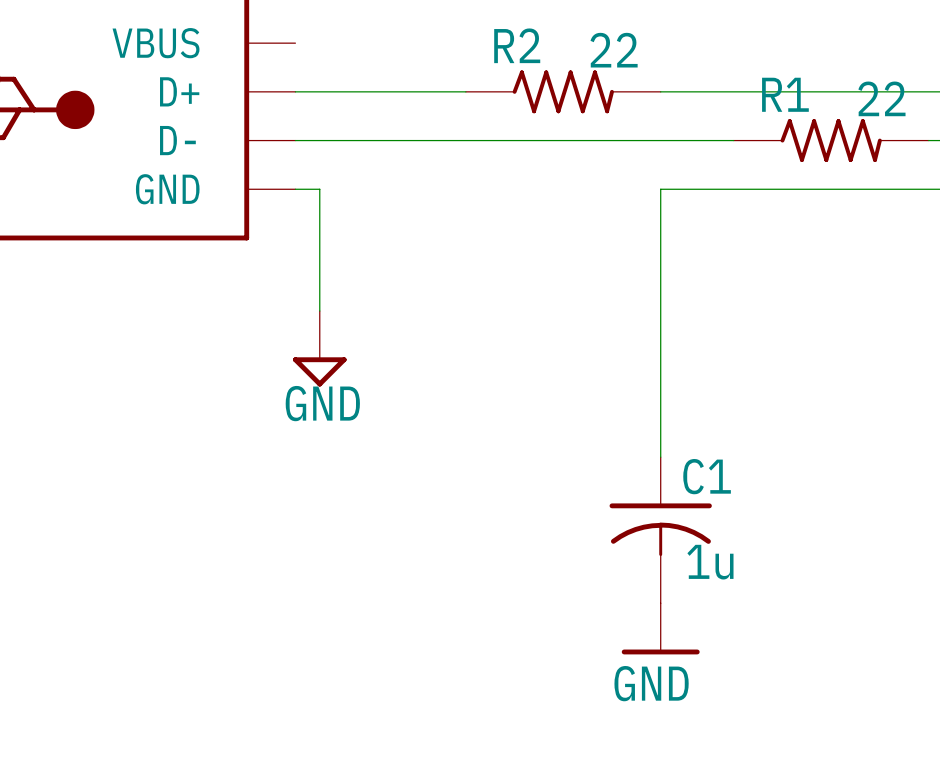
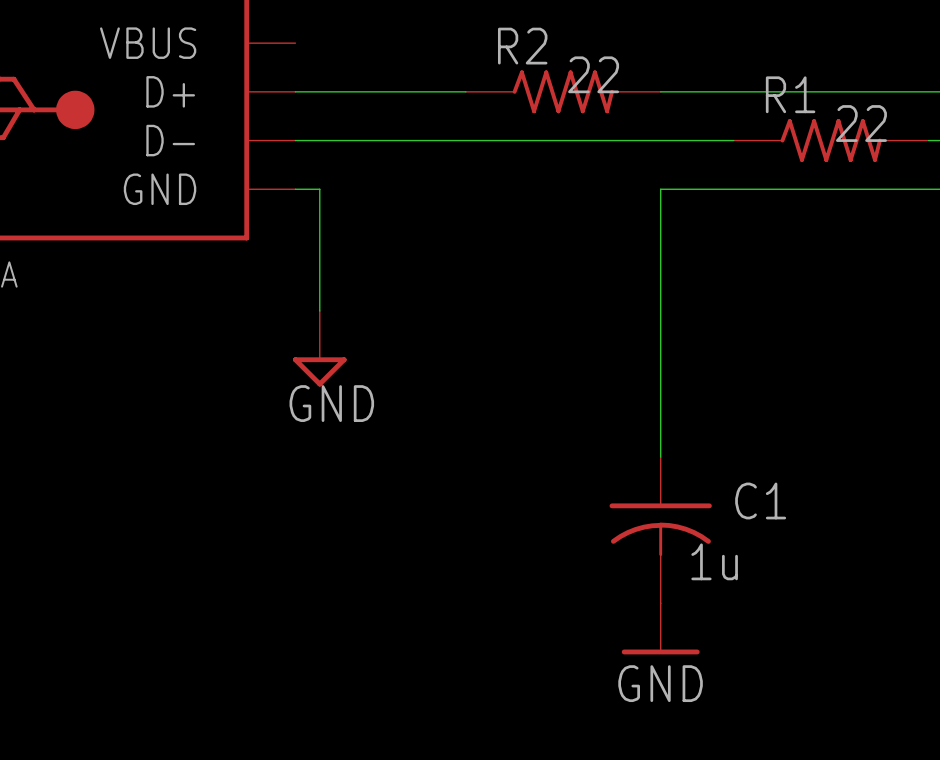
R2 text position: 22 (614, 50) -> 22 (593, 74)
R1 text position: 22 (881, 98) -> 22 (861, 123)
C1 name position: C1 (707, 476) -> C1 (760, 500)

